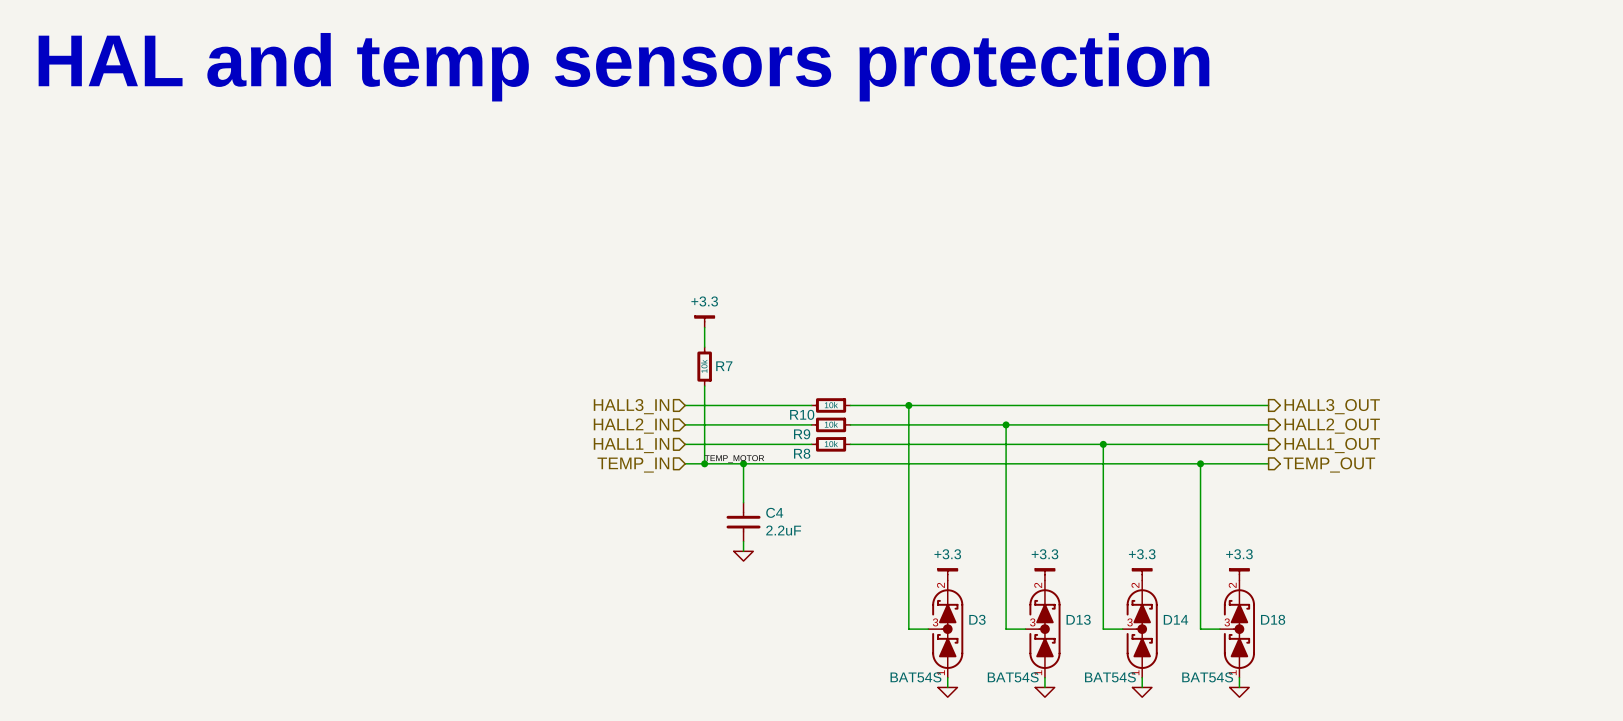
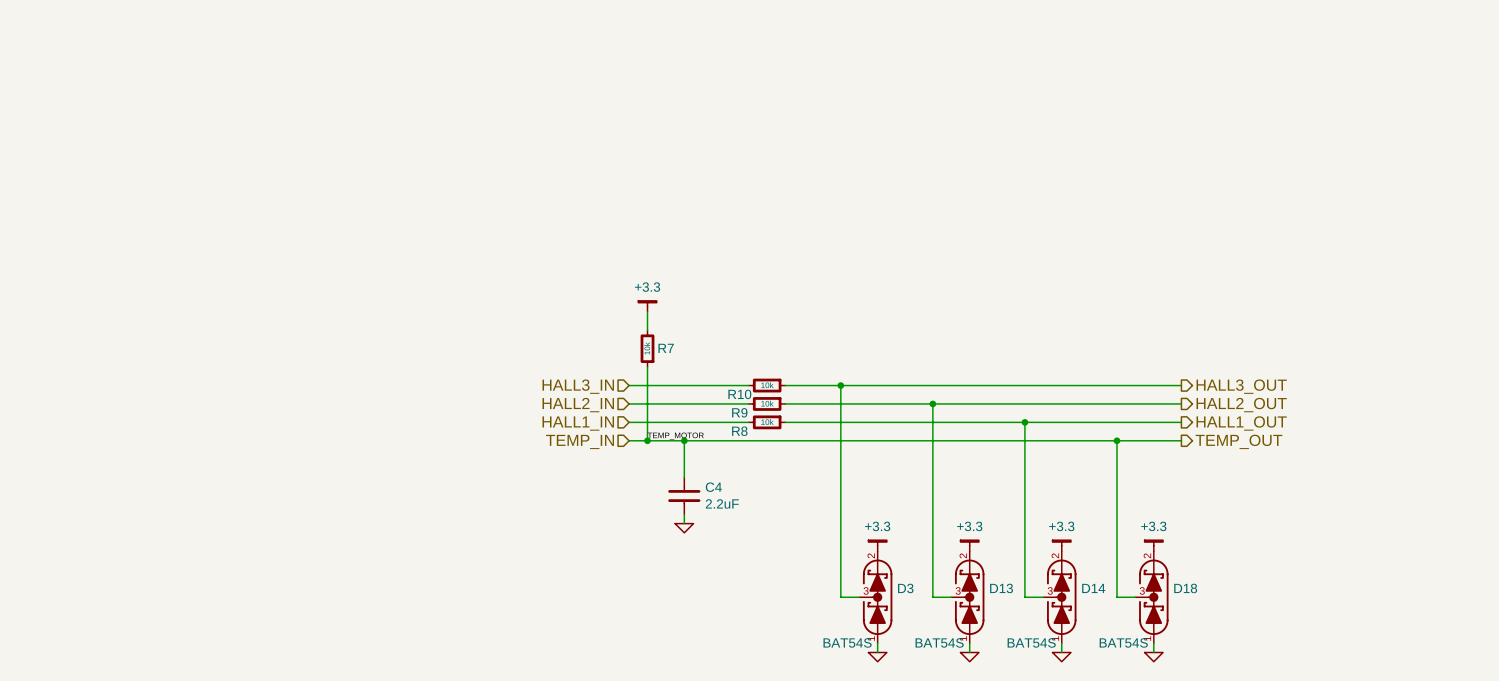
text: HAL and temp sensors protection (623, 67) -> none

